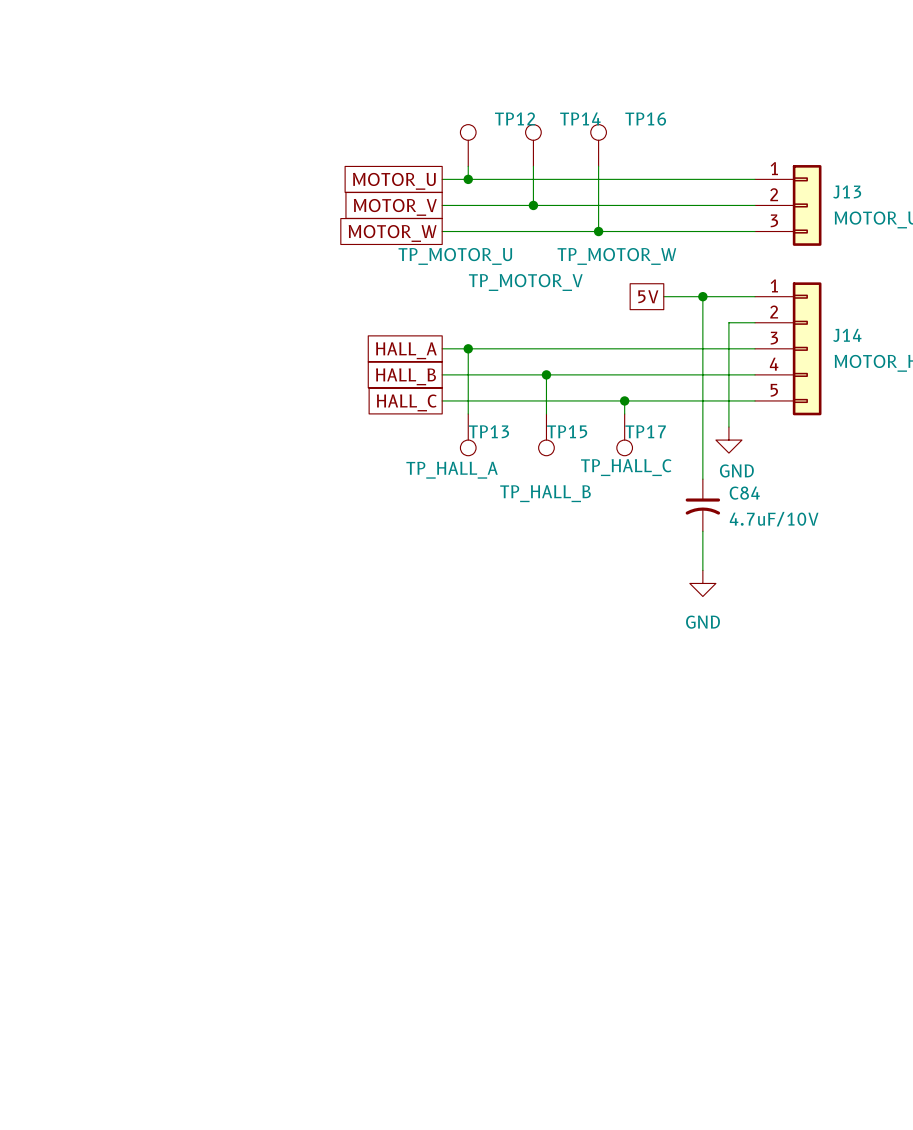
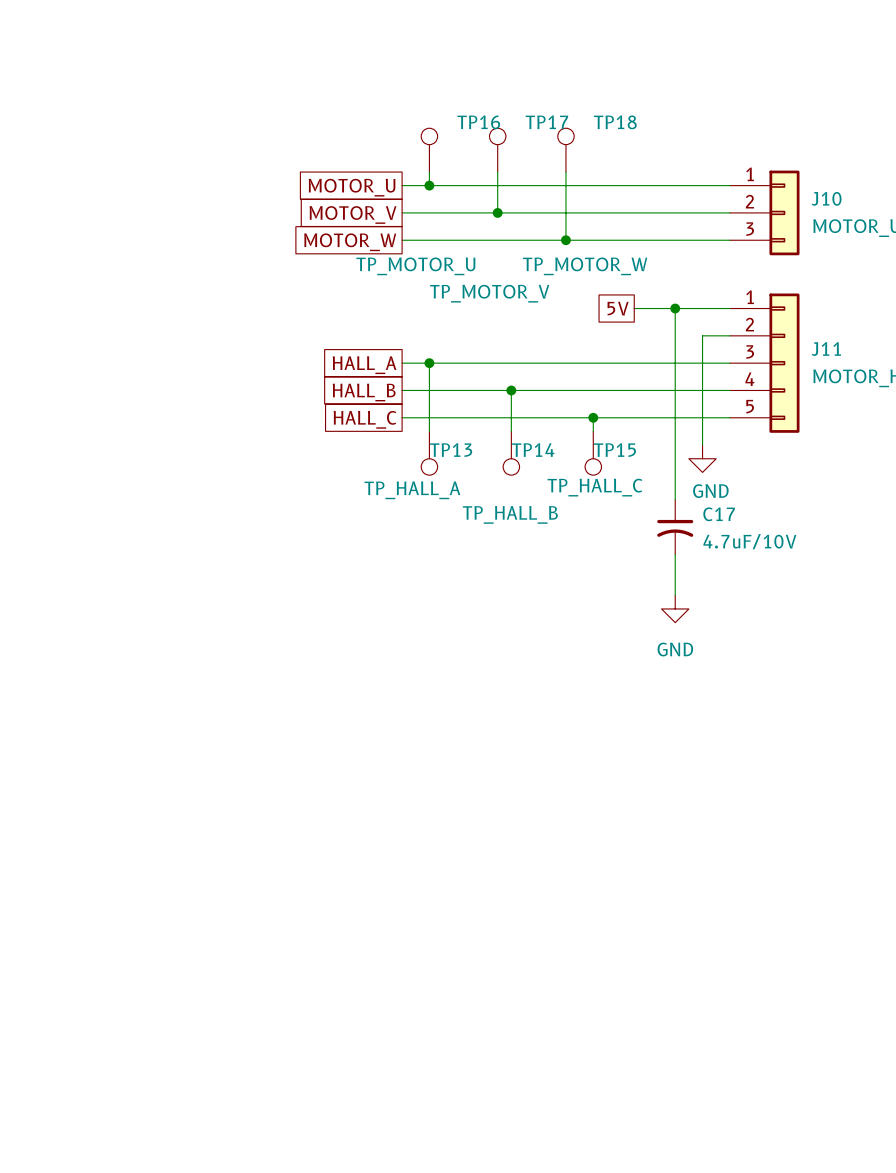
TP12 name: TP12 (515, 118) -> TP16 (478, 122)
TP14 name: TP14 (580, 118) -> TP17 (546, 122)
TP16 name: TP16 (645, 119) -> TP18 (615, 122)
J13 name: J13 (847, 191) -> J10 (826, 198)
J14 name: J14 (847, 335) -> J11 (826, 349)
TP15 name: TP15 (567, 431) -> TP14 (533, 450)
TP17 name: TP17 (645, 431) -> TP15 (614, 450)
C84 name: C84 (744, 493) -> C17 (719, 514)

